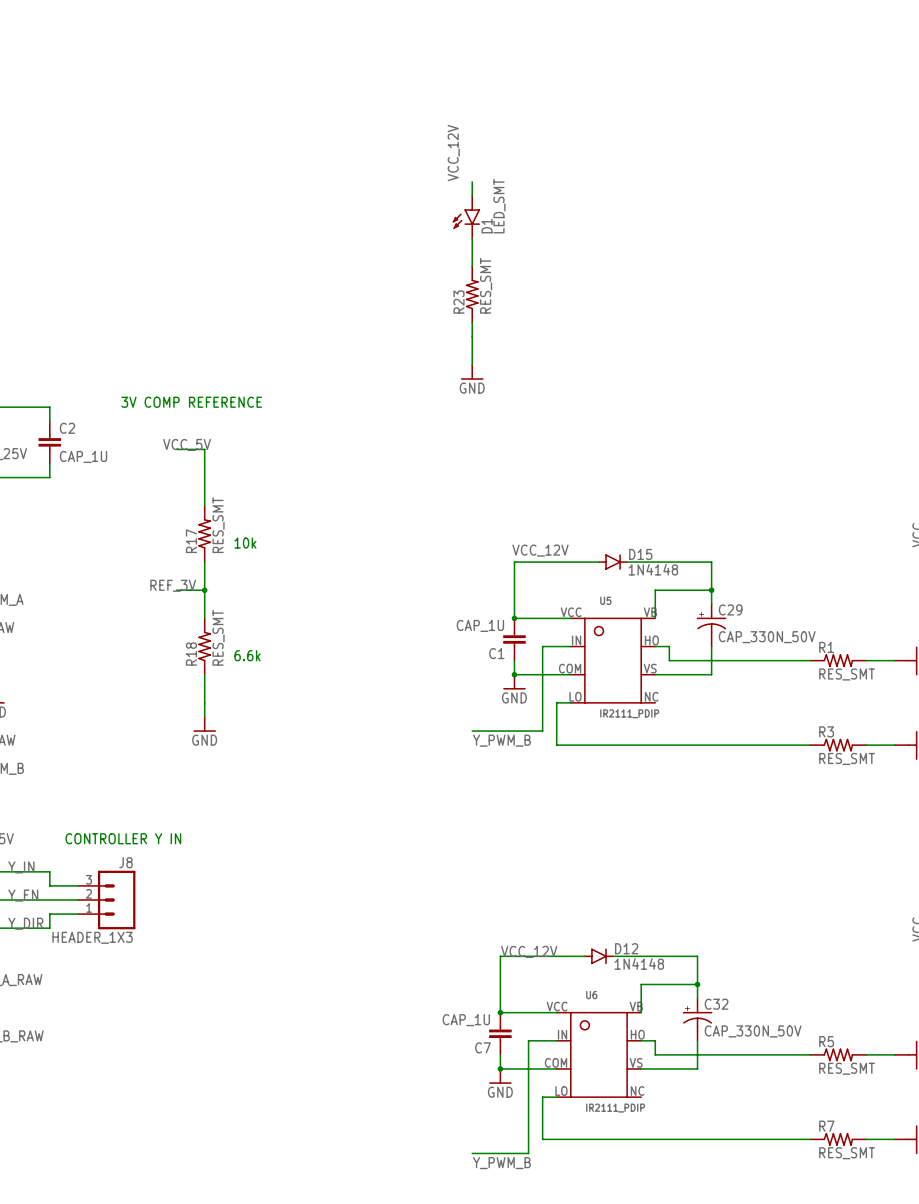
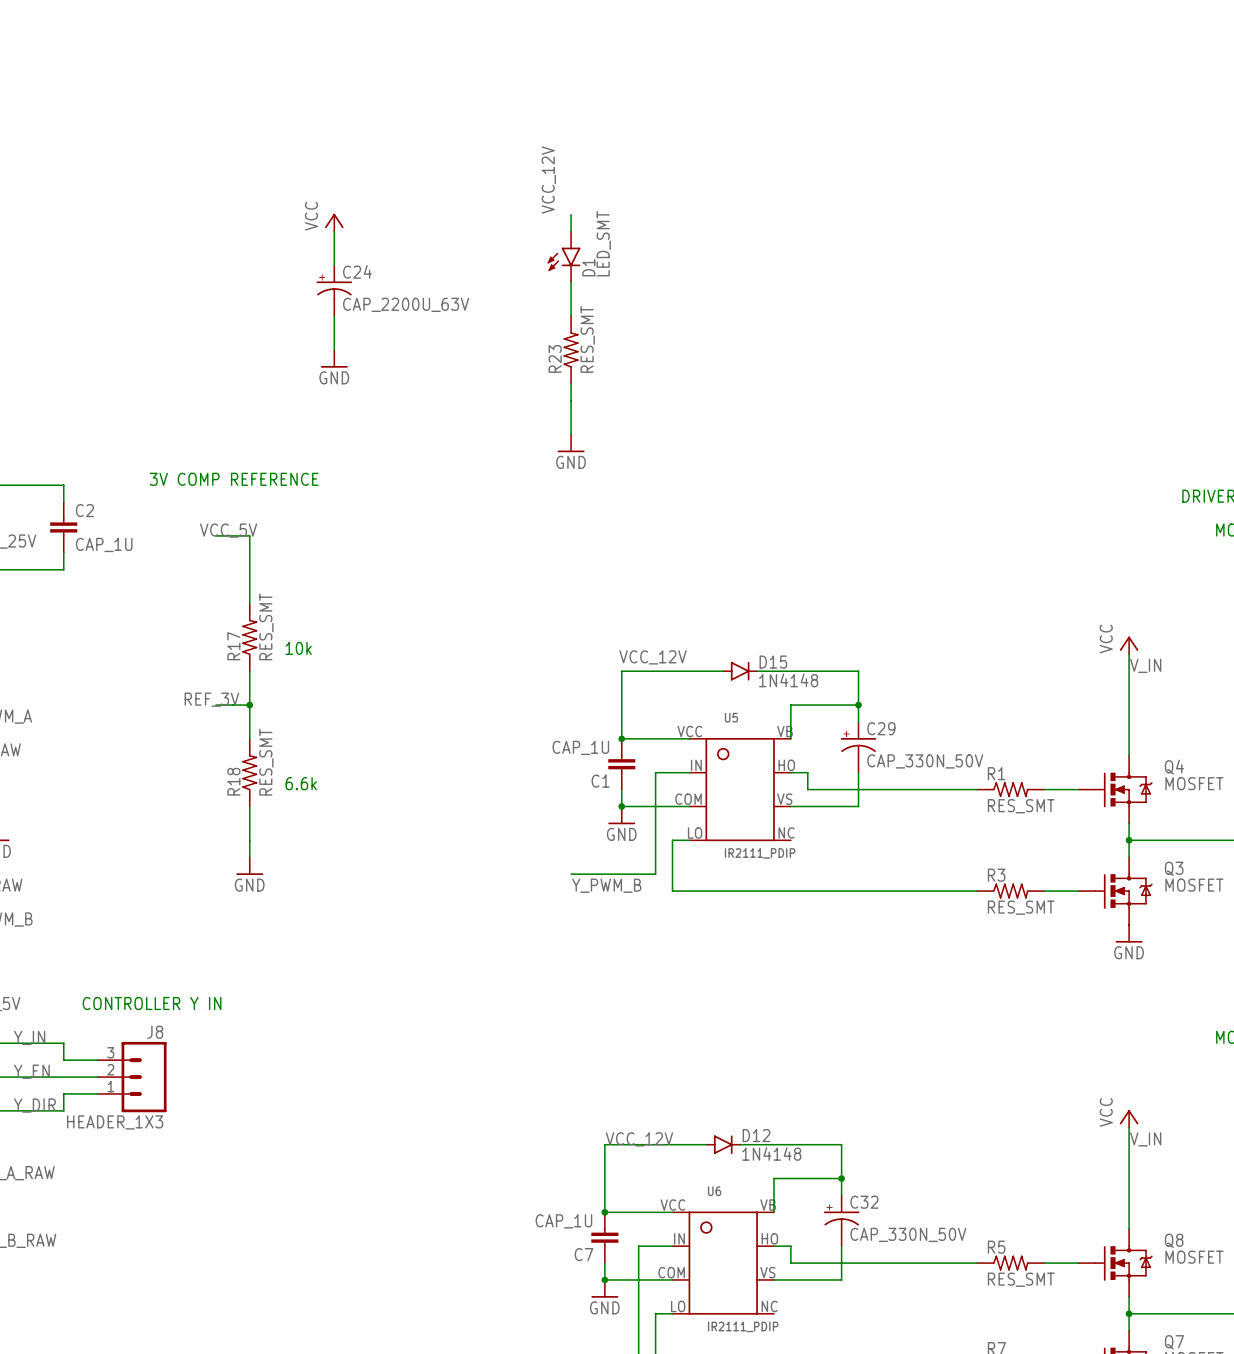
power symbol: none -> VCC (334, 222)
wire: none -> (334, 231) (334, 265)
C24: none -> CAP_2200U_63V (334, 290)
wire: none -> (334, 316) (334, 349)
power symbol: none -> GND (334, 358)

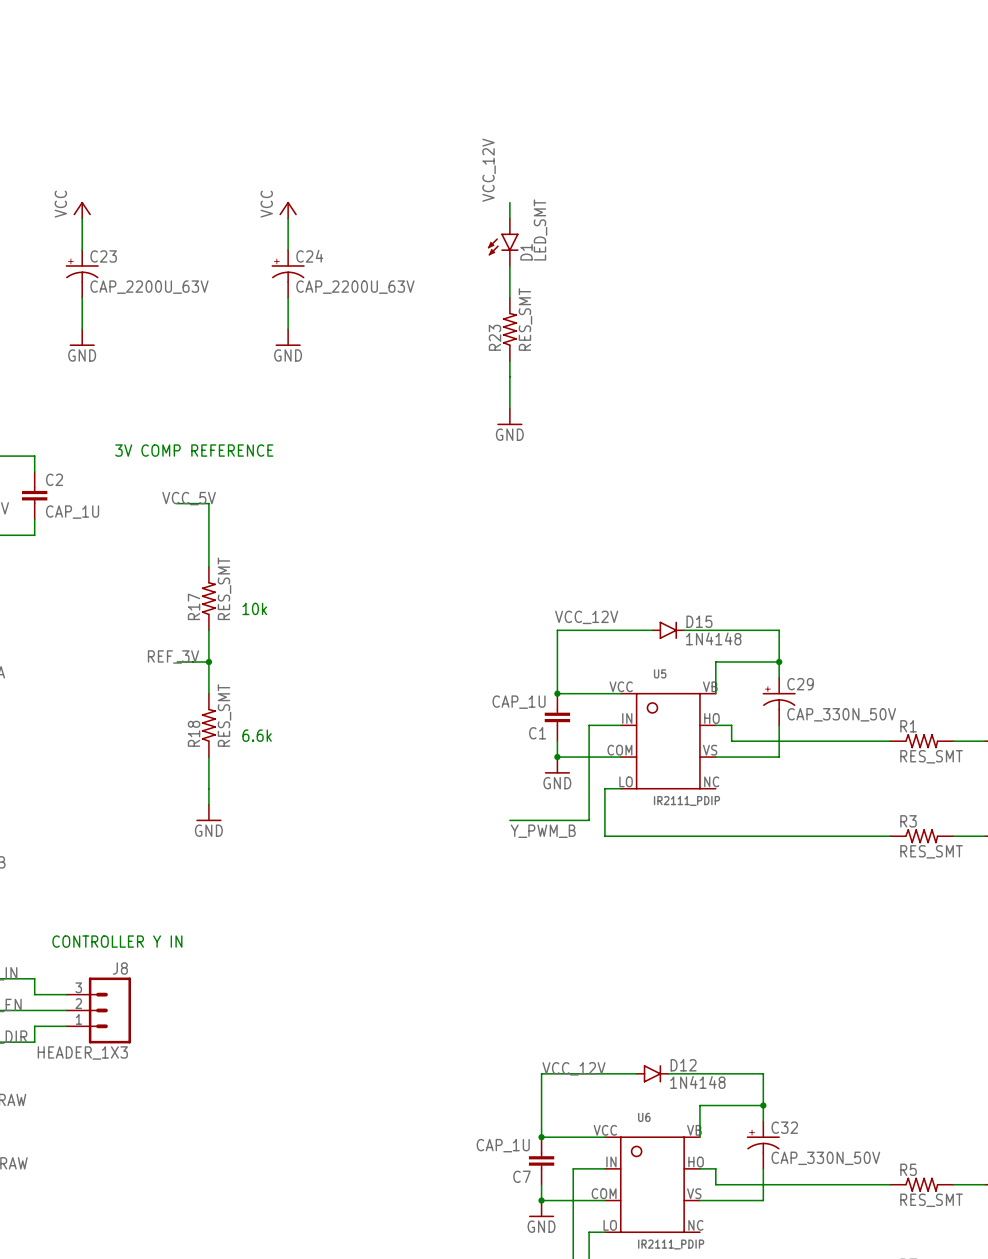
power symbol: none -> VCC (82, 210)
wire: none -> (82, 218) (82, 250)
C23: none -> CAP_2200U_63V (82, 273)
wire: none -> (82, 297) (82, 329)
power symbol: none -> GND (82, 337)

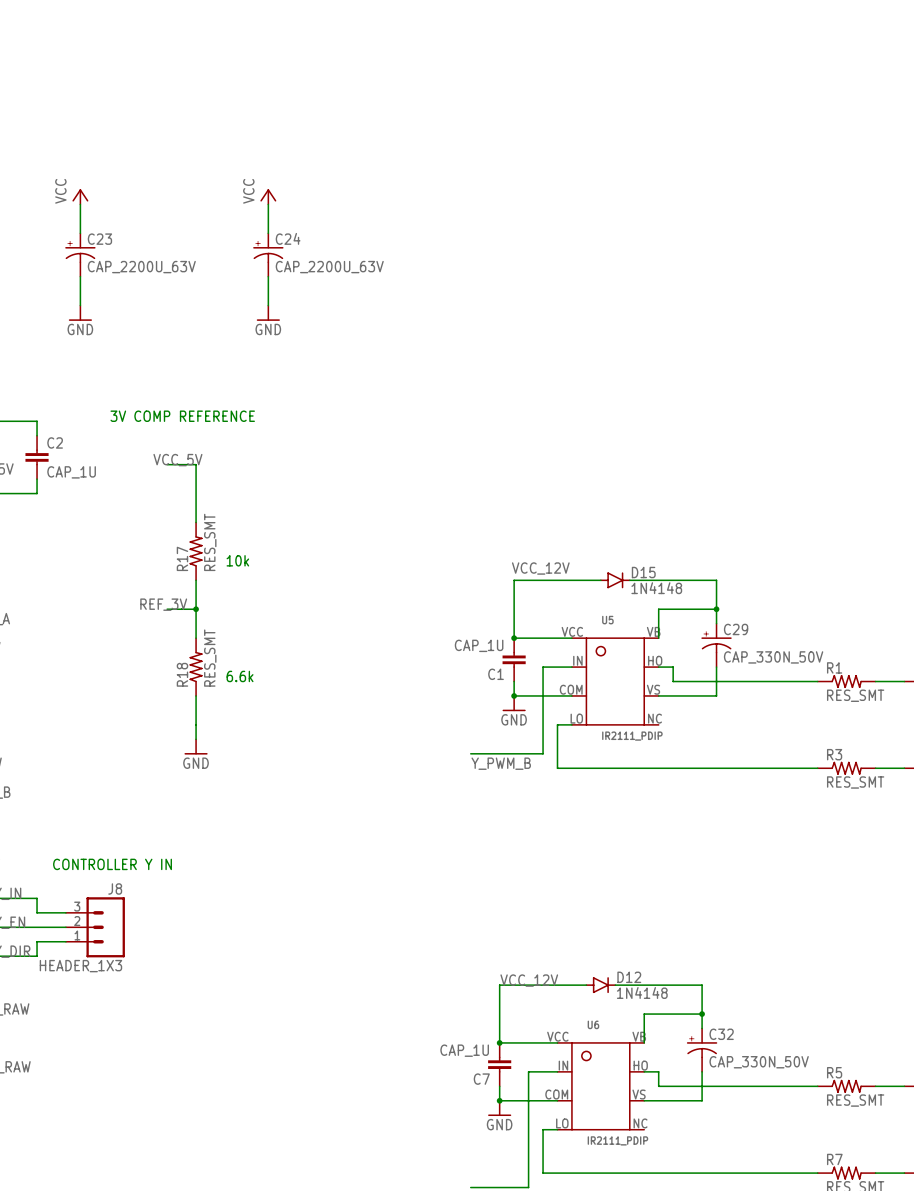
label: VCC_12V (489, 170) -> none
wire: (509, 202) (509, 218) -> none
D1: LED_SMT (503, 242) -> none
wire: (509, 265) (509, 297) -> none
R23: RES_SMT (509, 329) -> none
wire: (509, 361) (509, 408) -> none
power symbol: GND (509, 416) -> none

